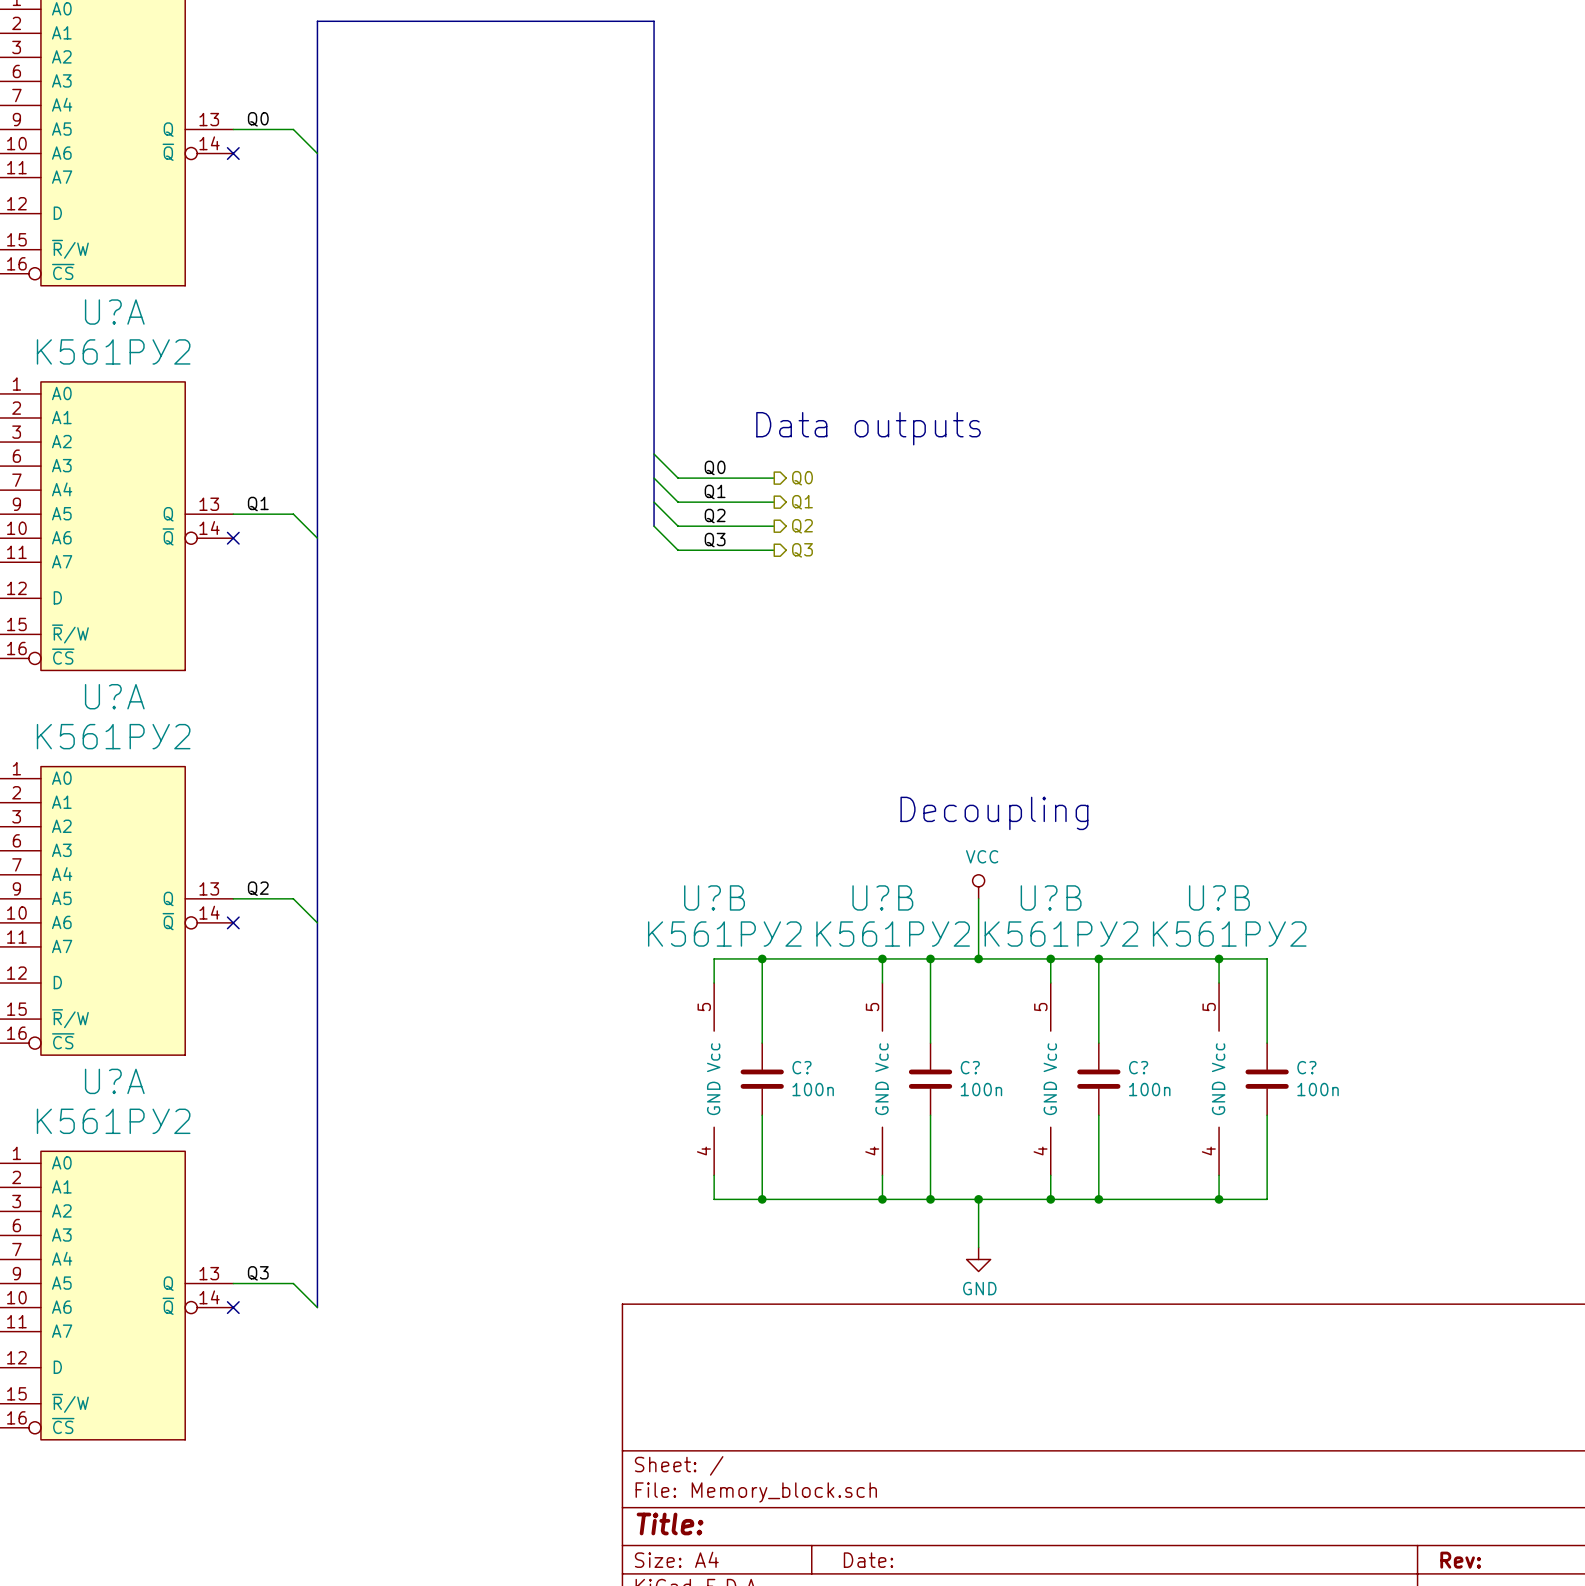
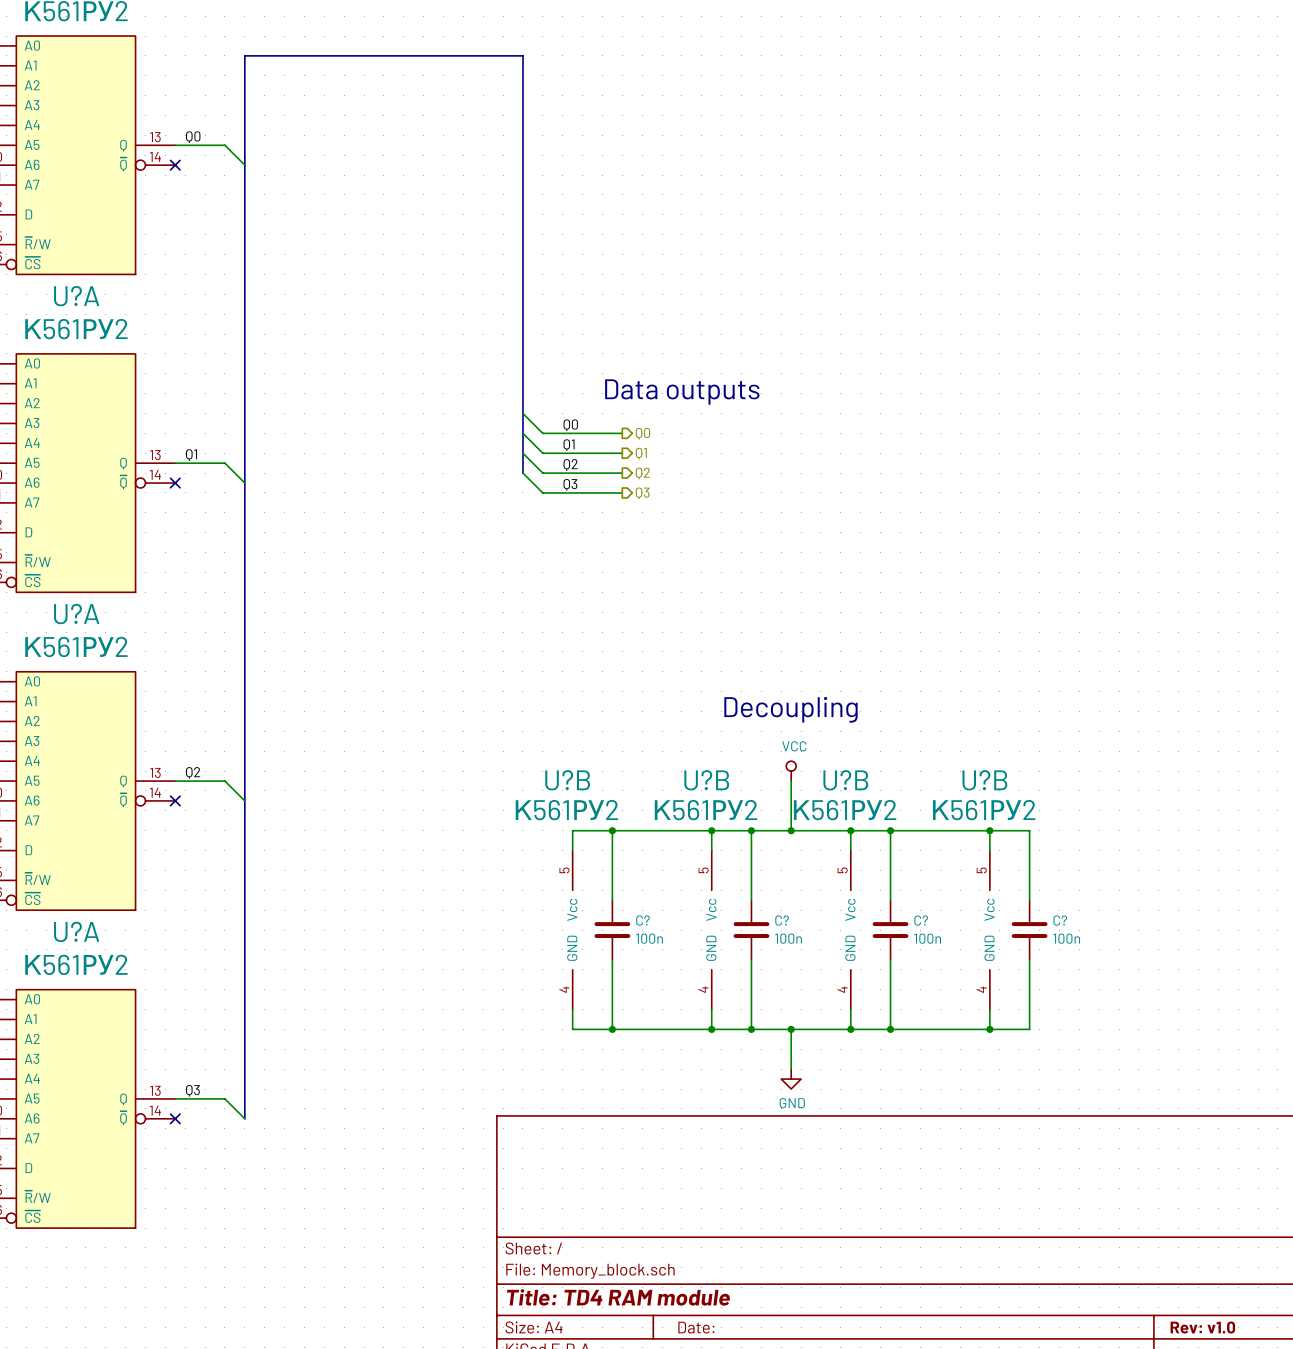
title block: Title: (670, 1523) -> Title: TD4 RAM module (618, 1297)
title block: Rev: (1460, 1560) -> Rev: v1.0 (1202, 1327)

